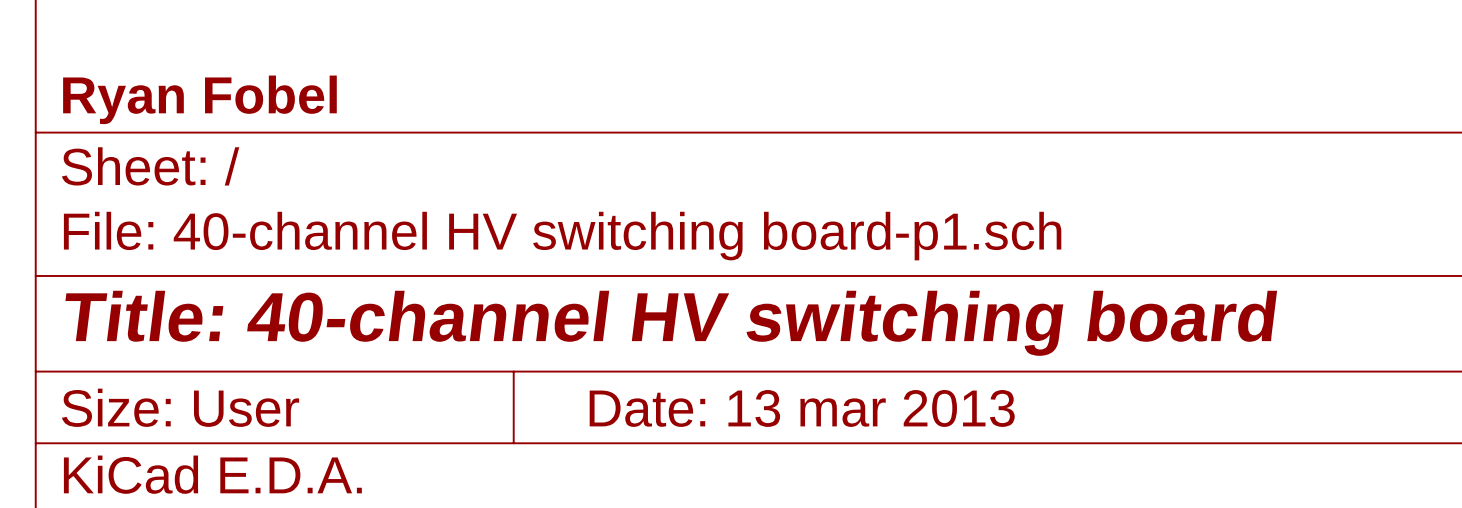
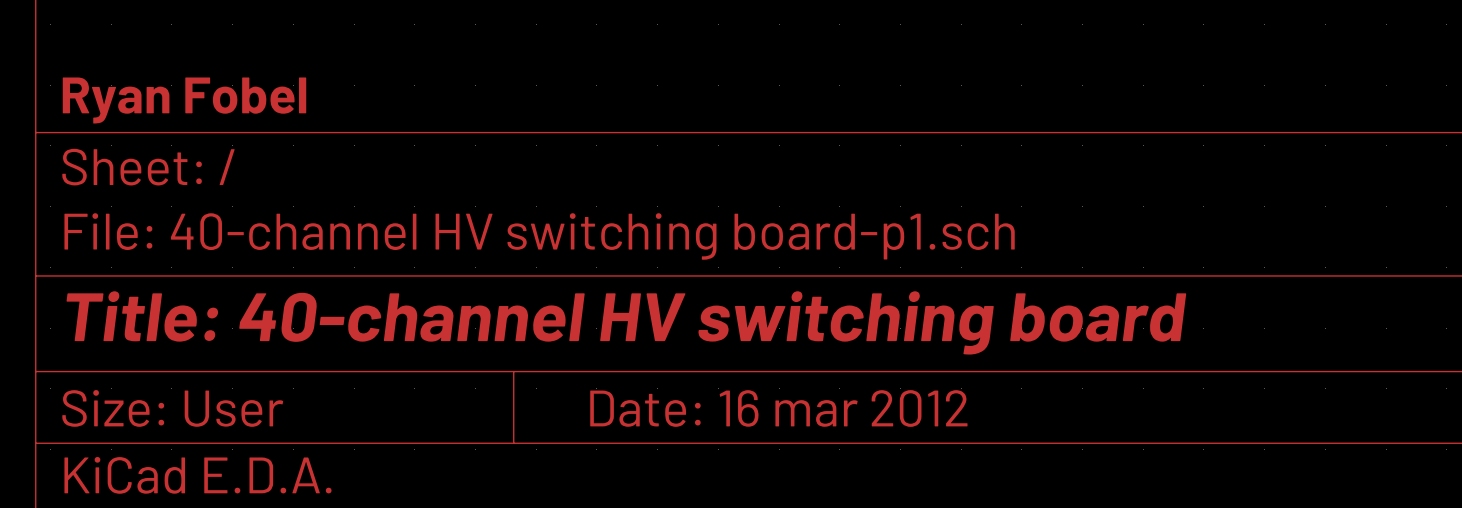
title block: Date: 13 mar 2013 (802, 408) -> Date: 16 mar 2012 (778, 408)

